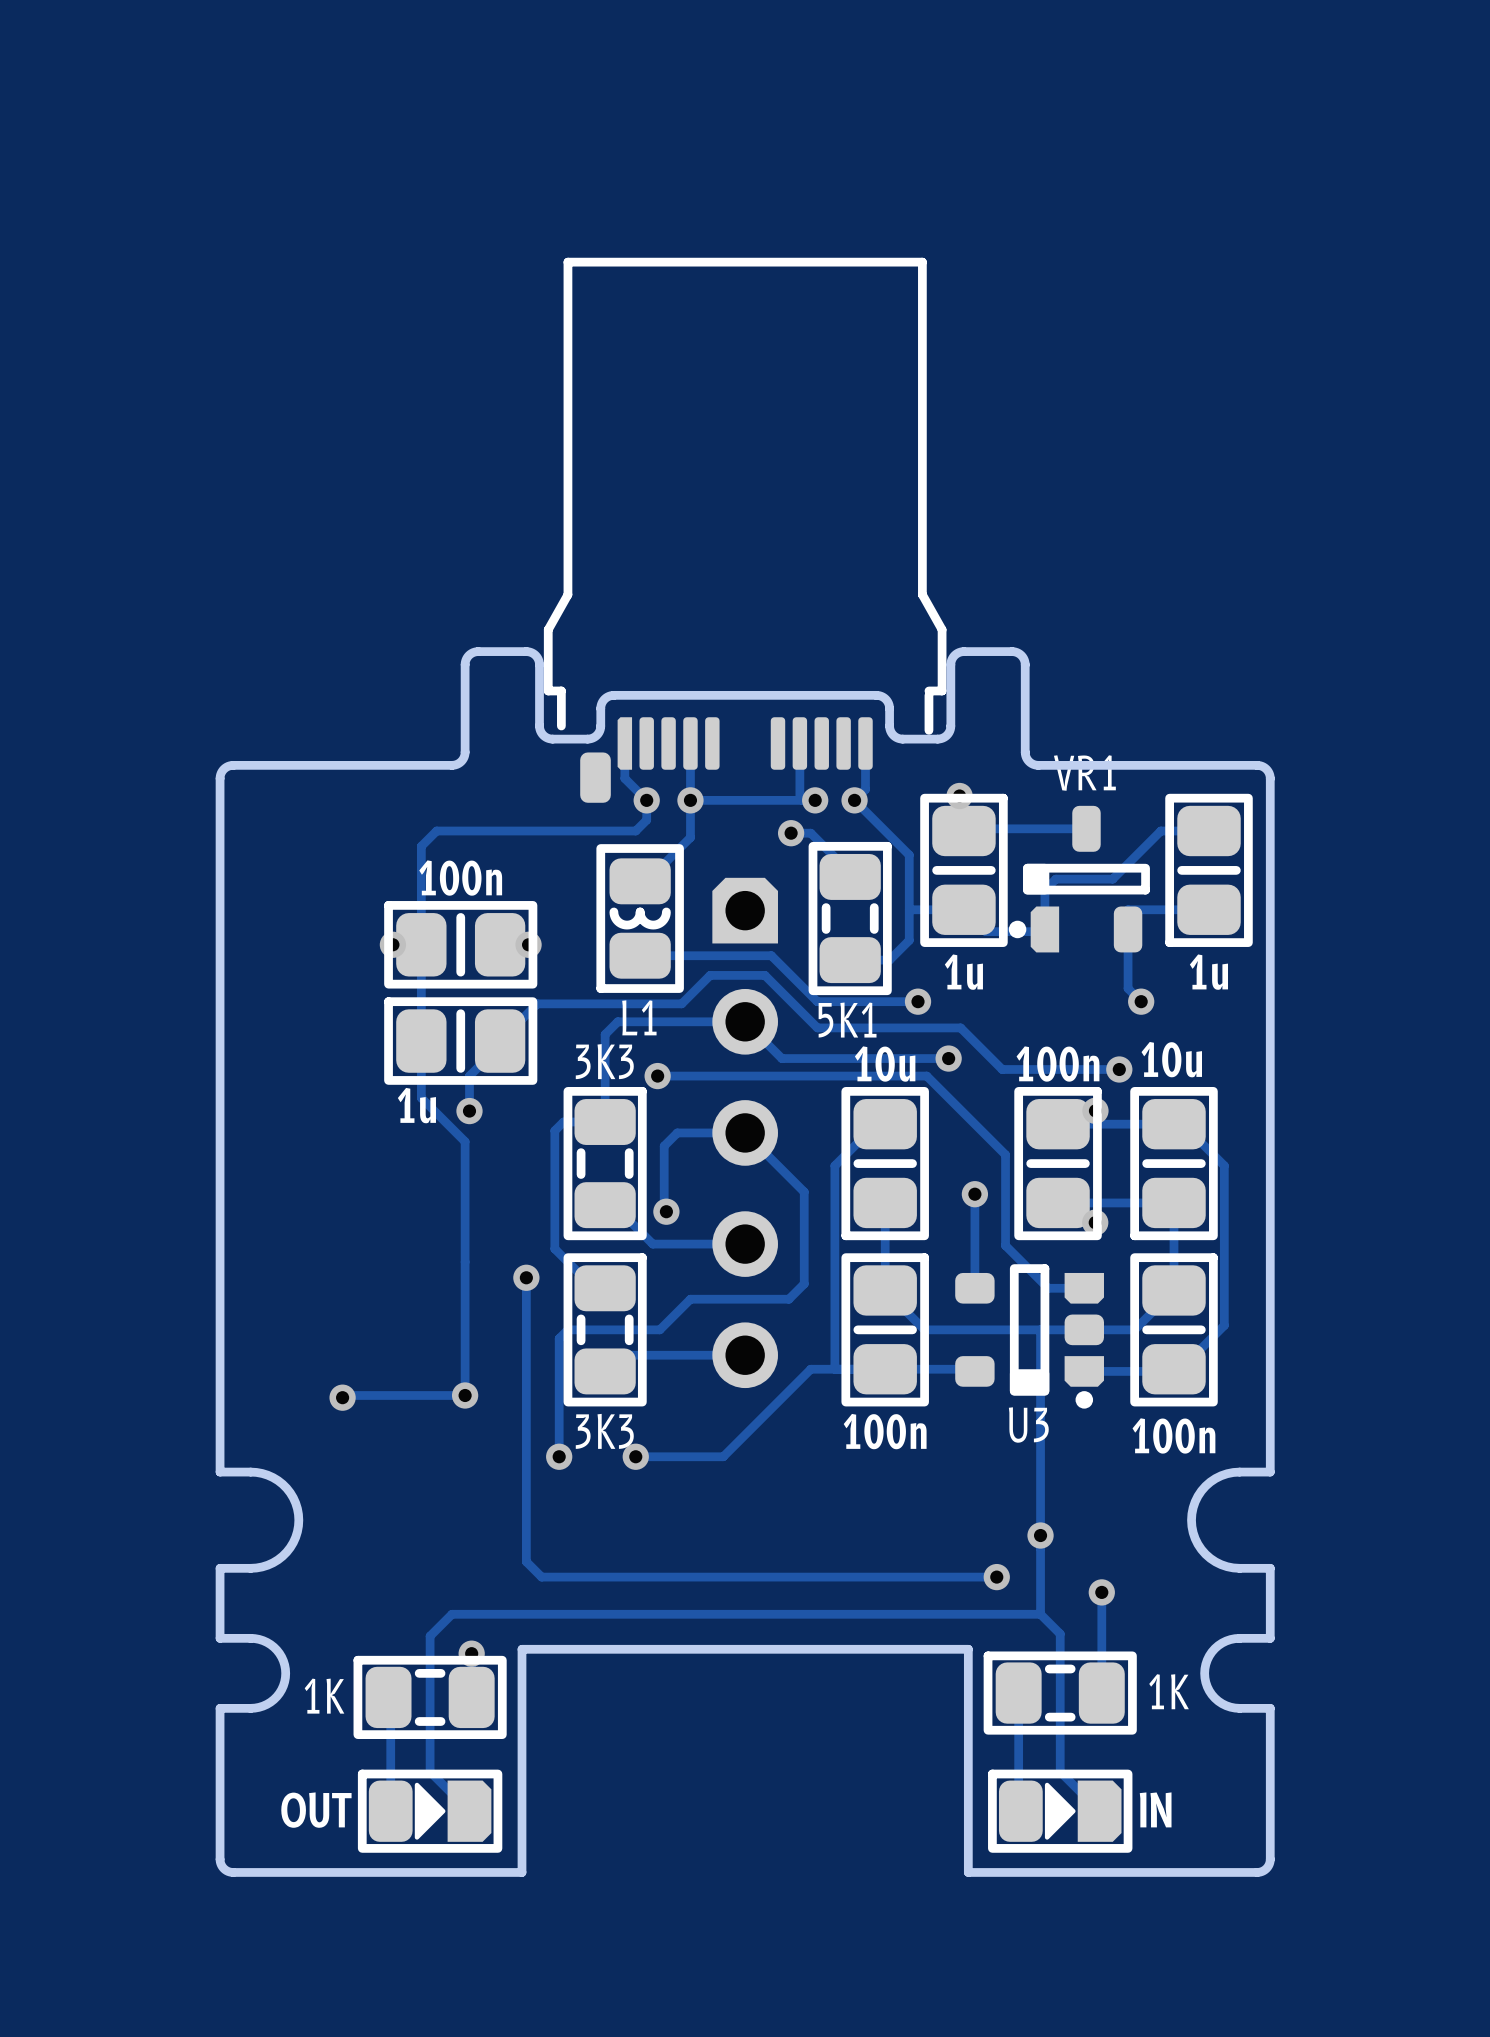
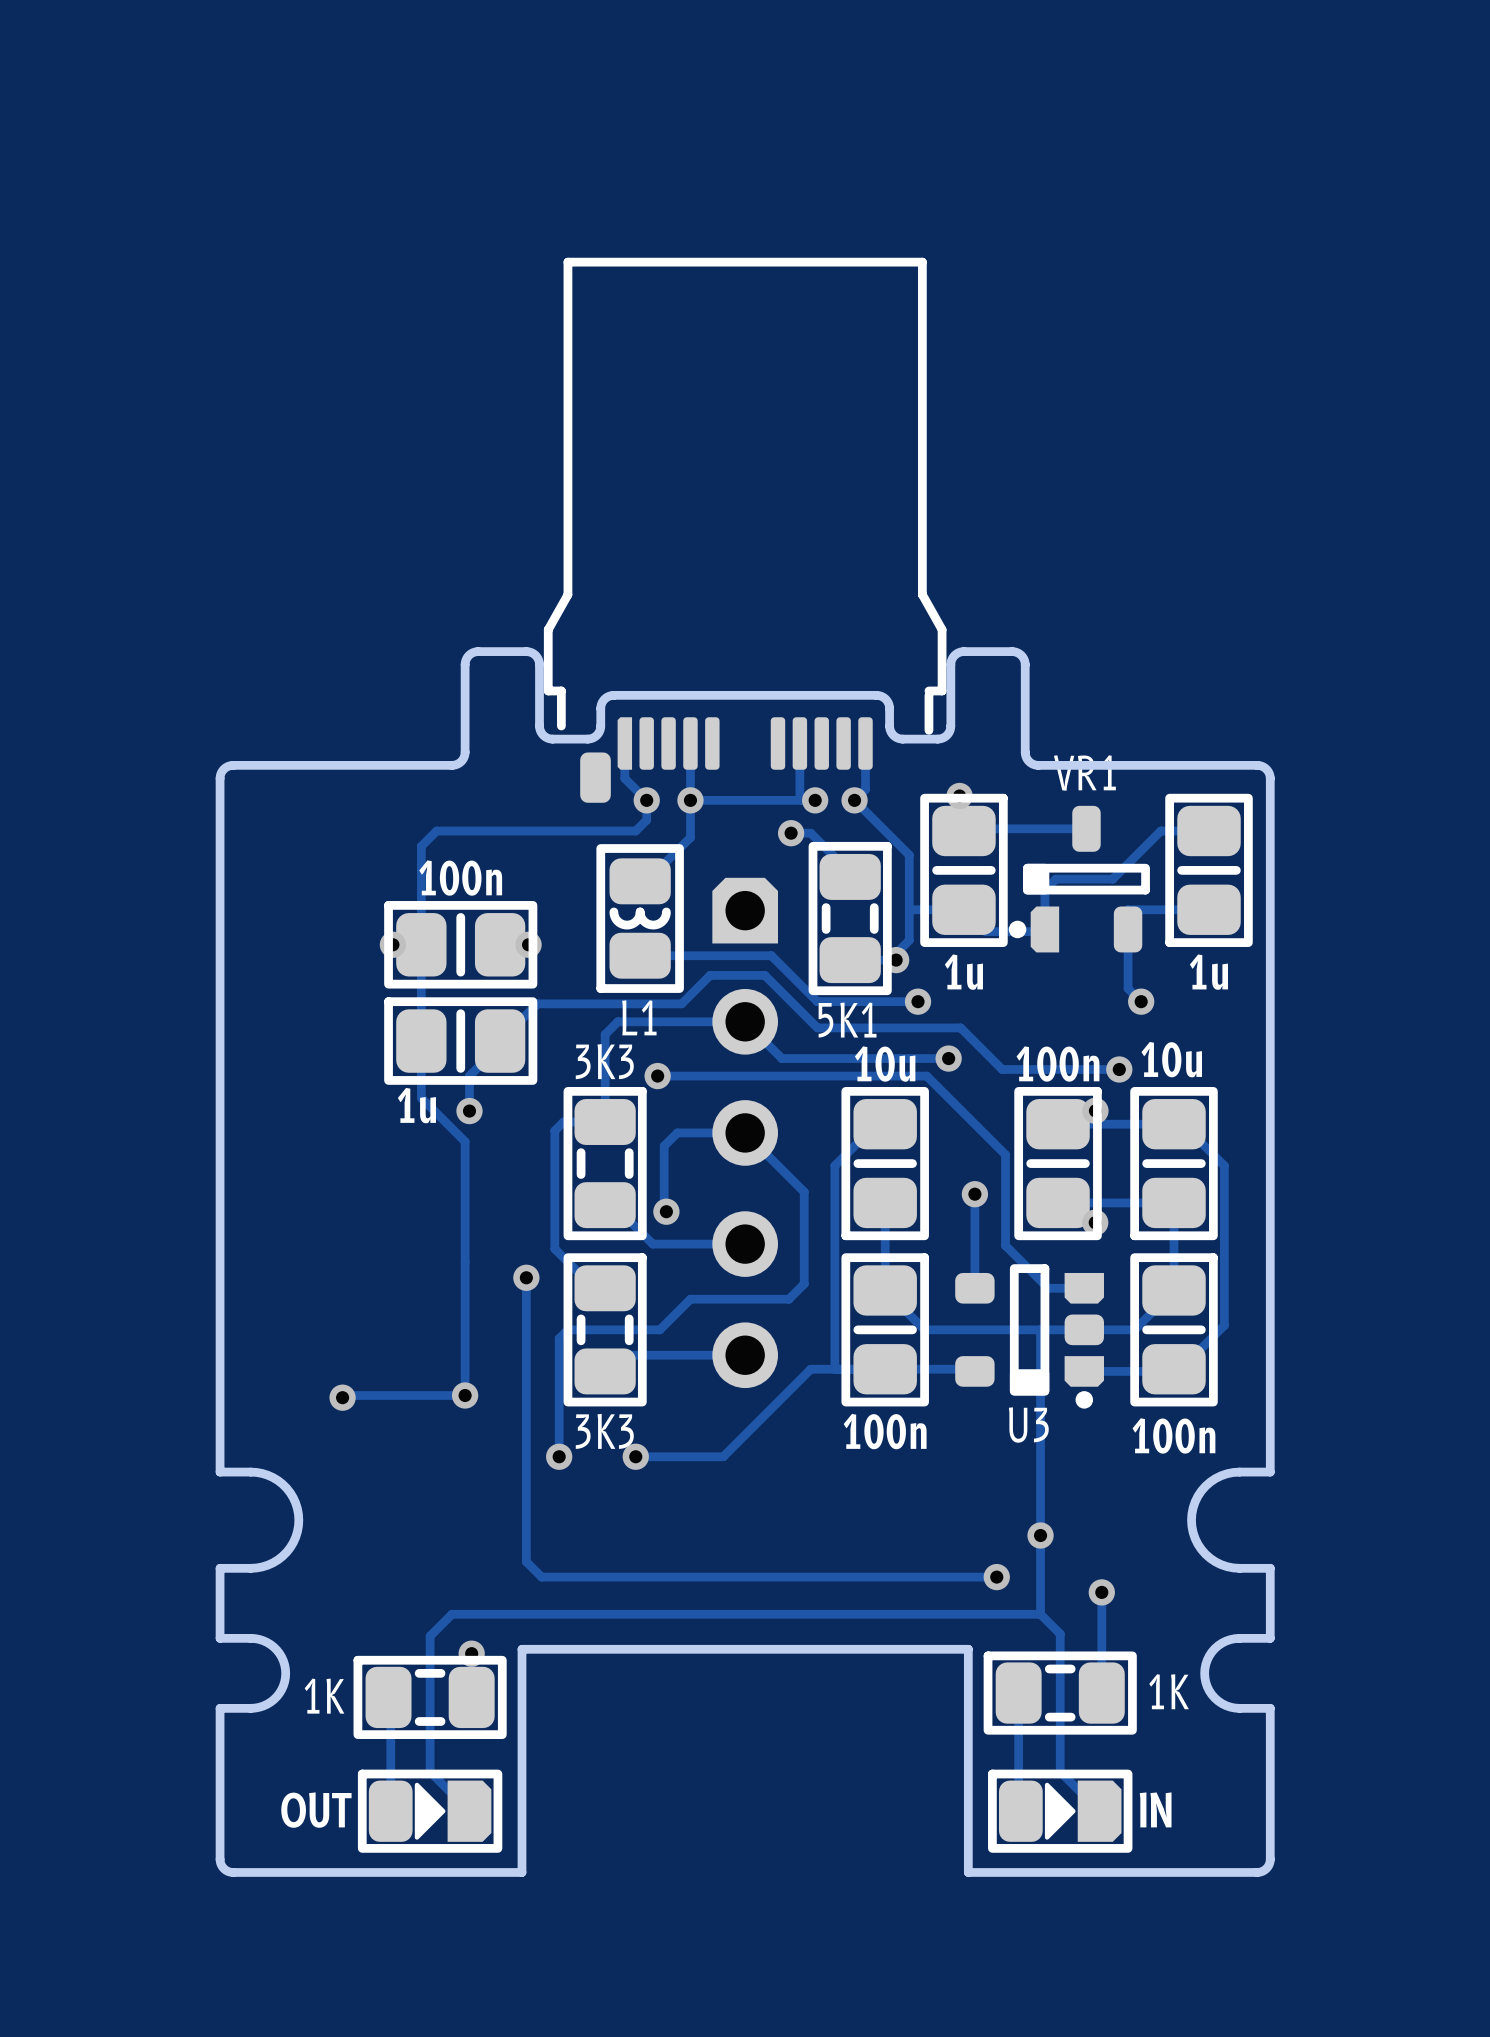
via: none -> (896, 960)

